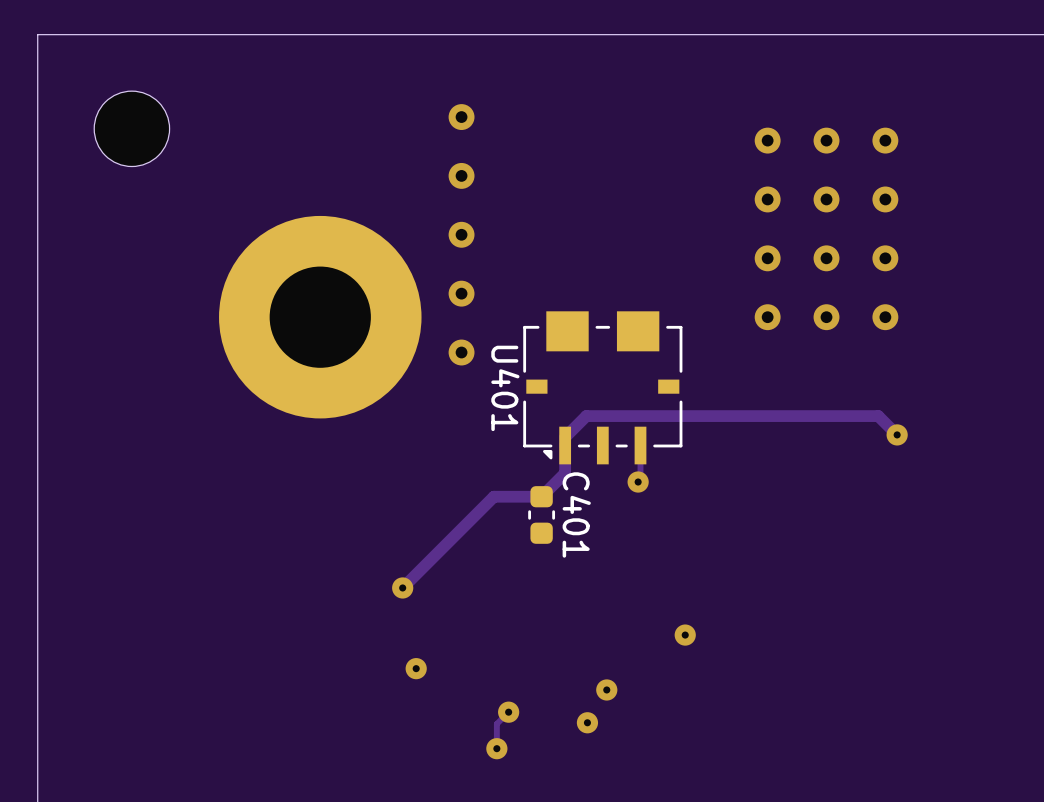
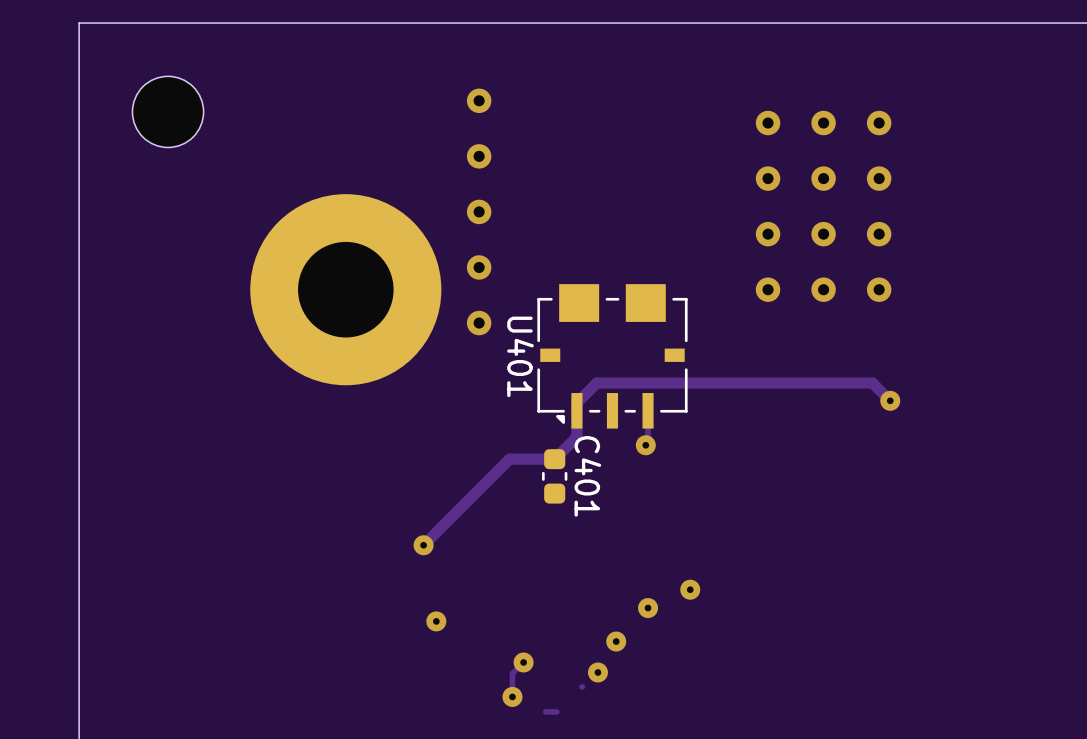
via: none -> (648, 608)
track: none -> (582, 686) (581, 686)
track: none -> (556, 711) (545, 711)

